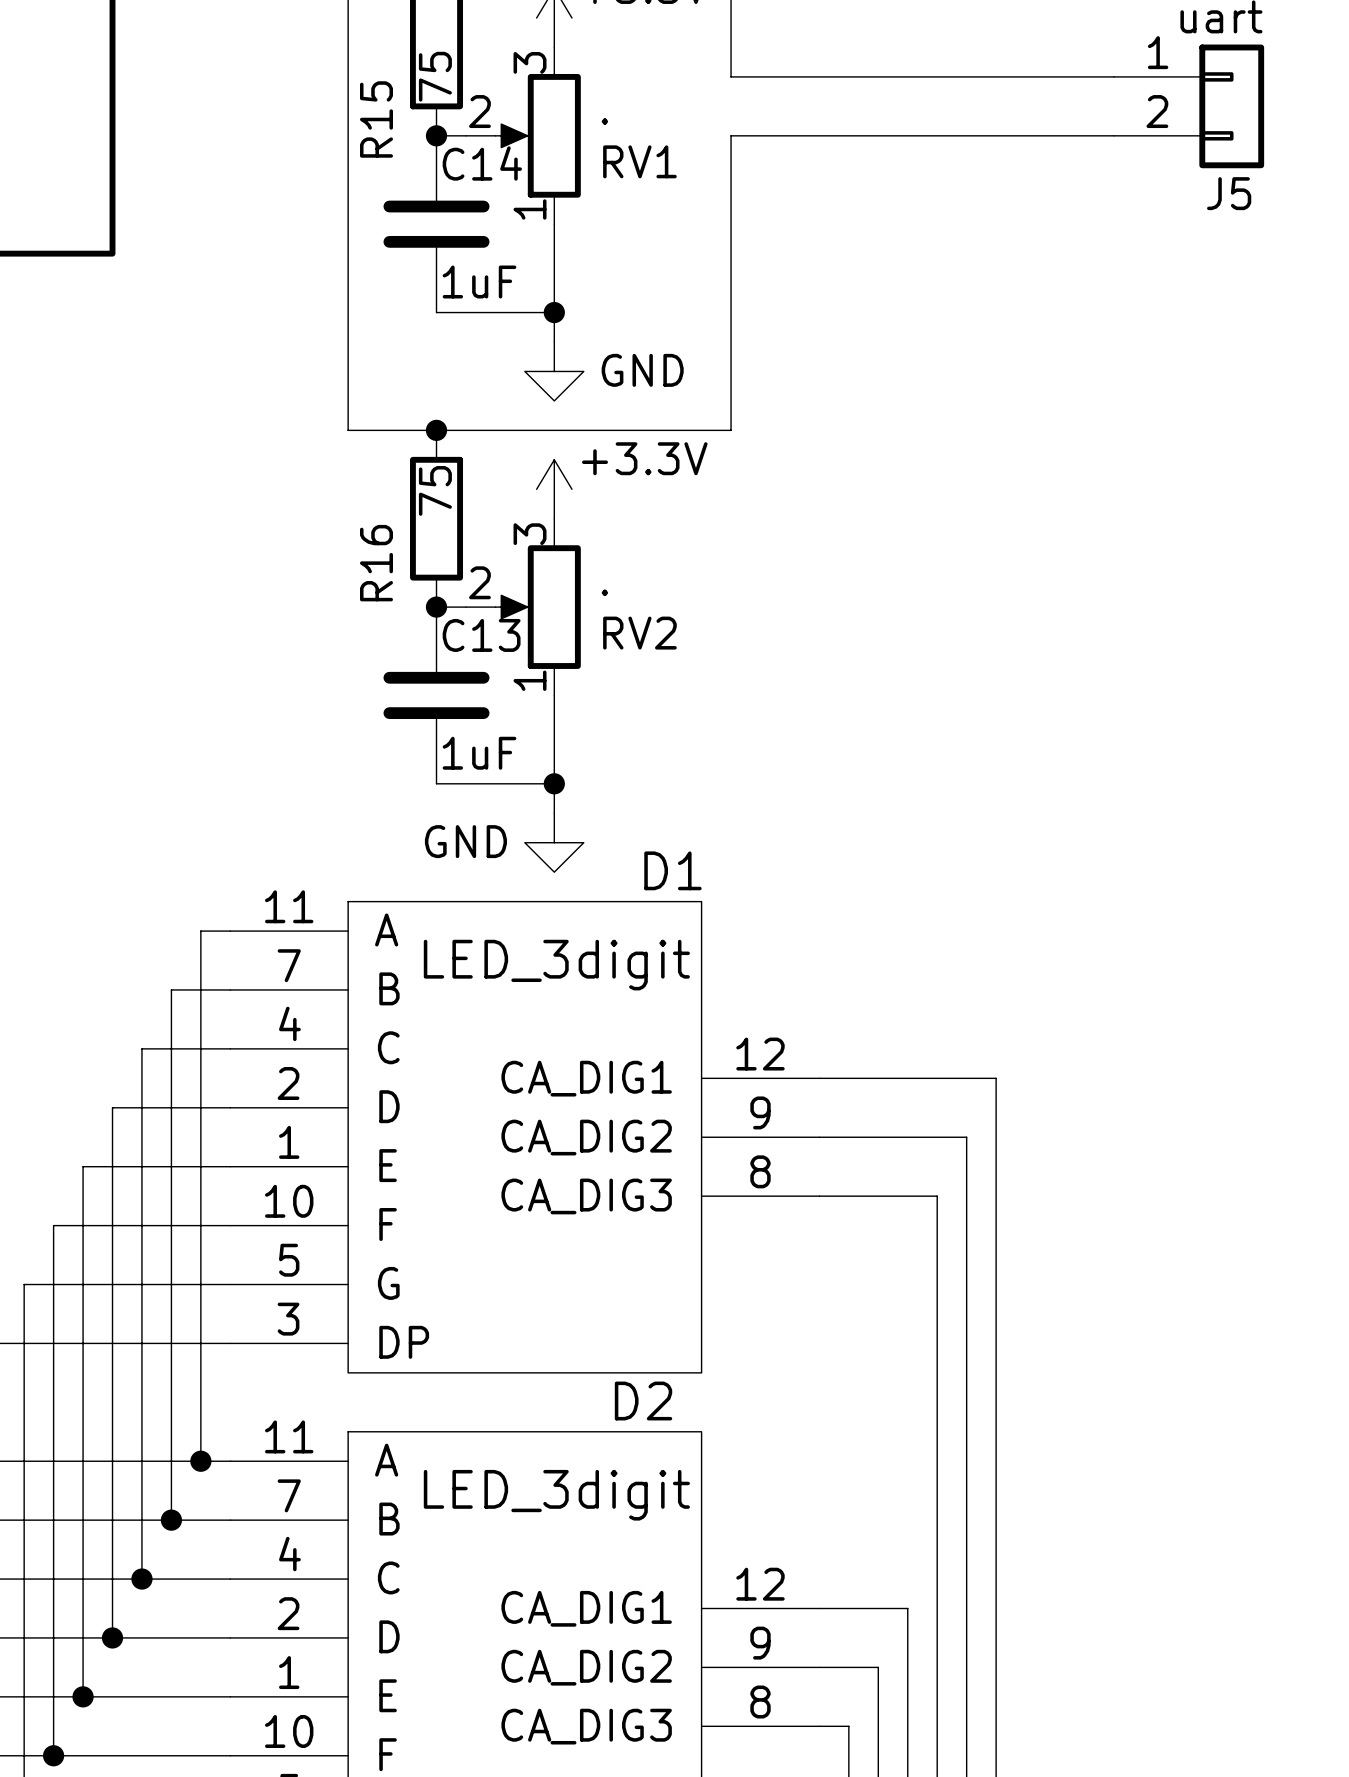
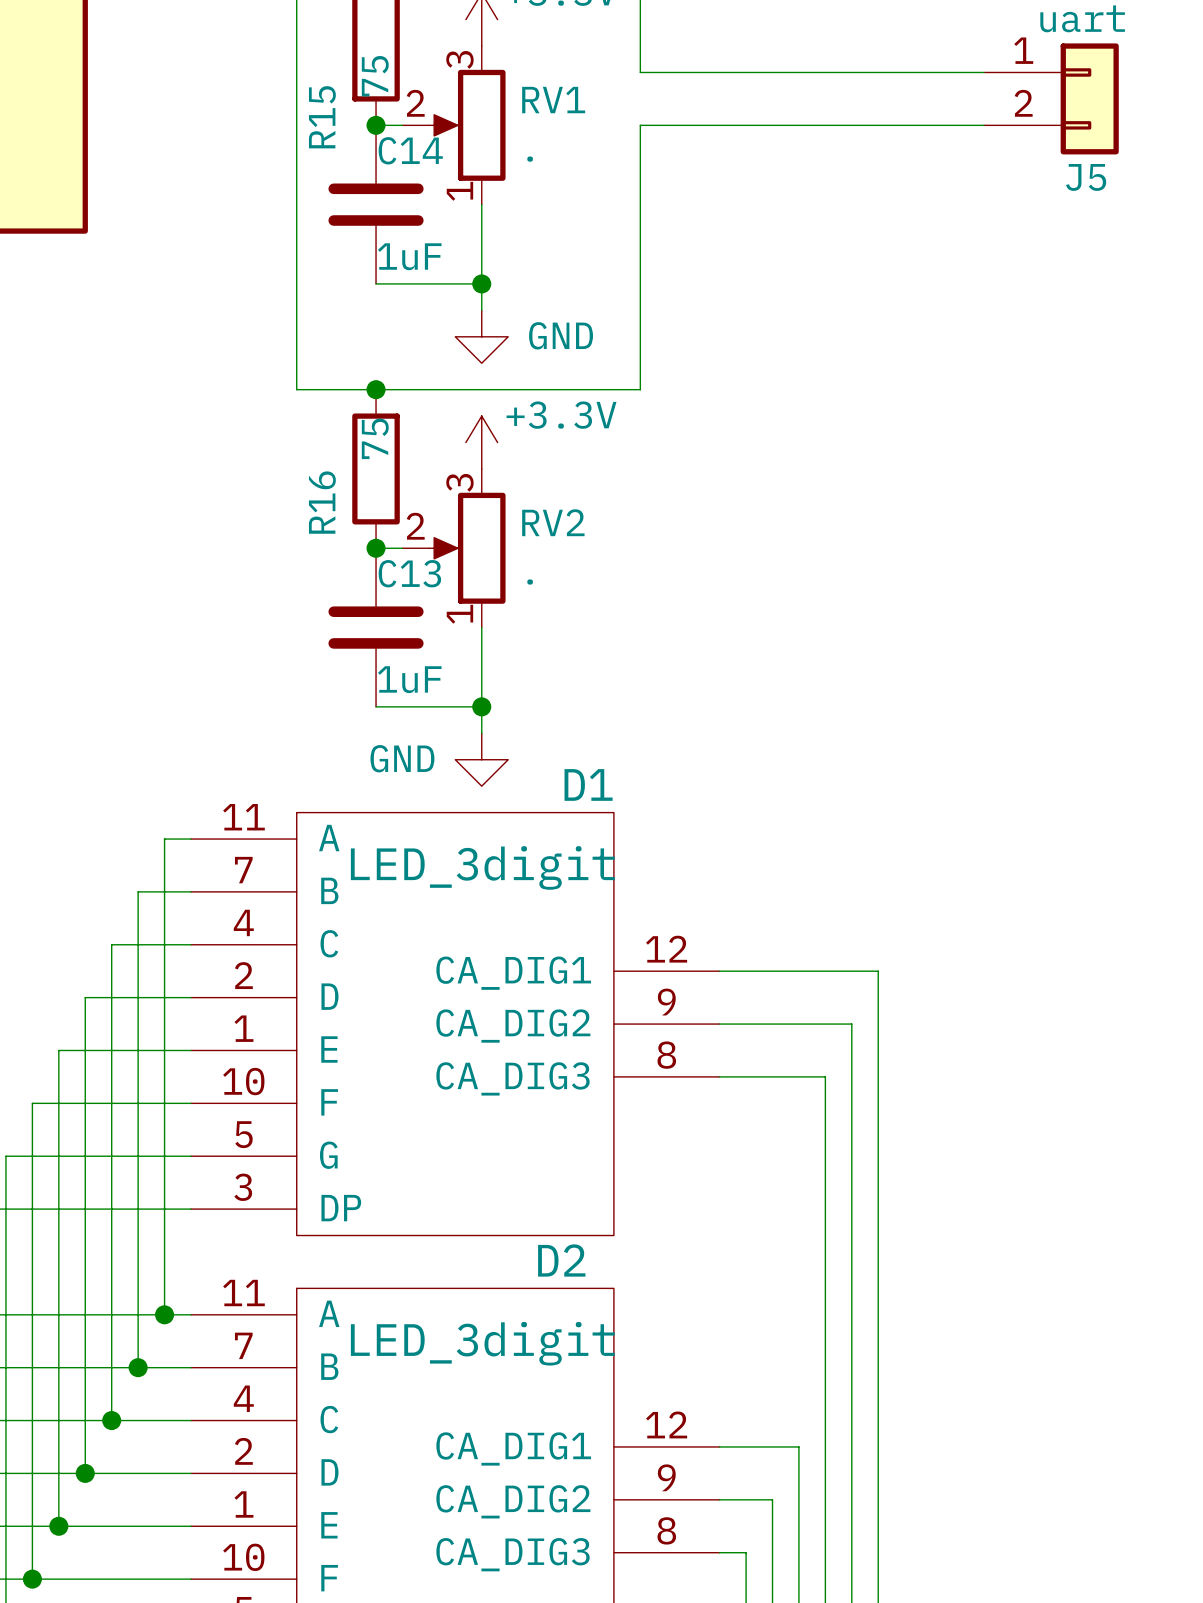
RV1 value position: . (604, 121) -> . (530, 159)
RV1 name position: RV1 (639, 161) -> RV1 (553, 100)
RV2 value position: . (604, 592) -> . (530, 582)
RV2 name position: RV2 (639, 633) -> RV2 (553, 522)

